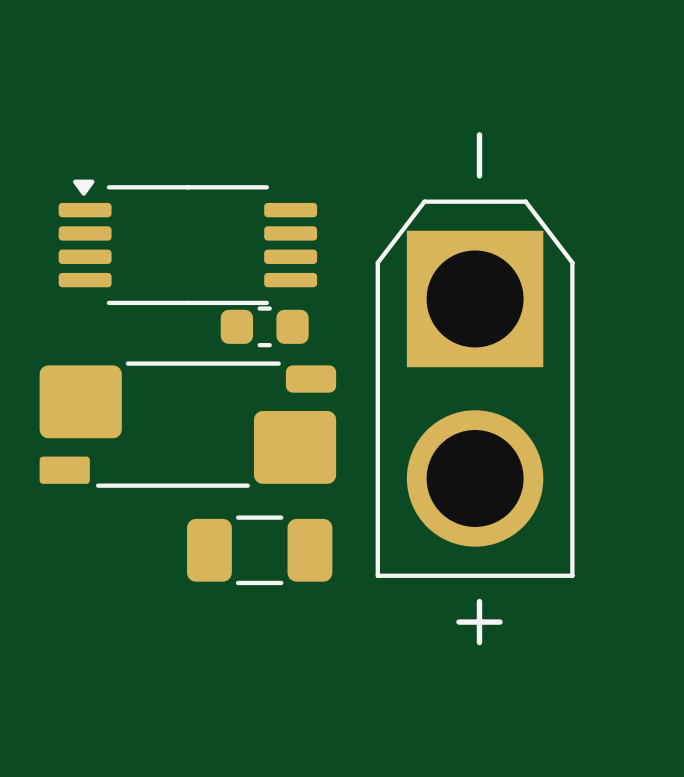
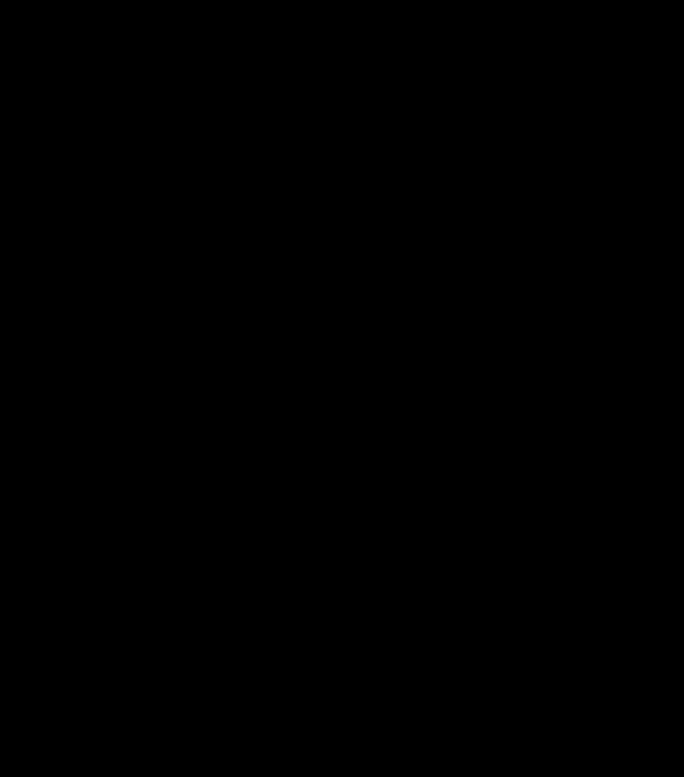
part: (187, 242) -> none
part: (264, 326) -> none
part: (475, 388) -> none
part: (187, 424) -> none
part: (259, 550) -> none

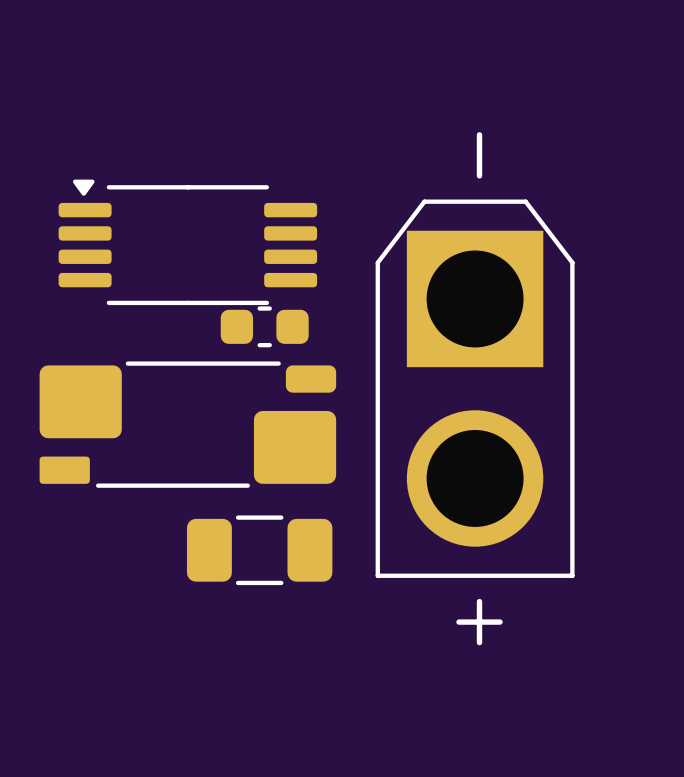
part: none -> (187, 242)
part: none -> (264, 326)
part: none -> (475, 388)
part: none -> (187, 424)
part: none -> (259, 550)

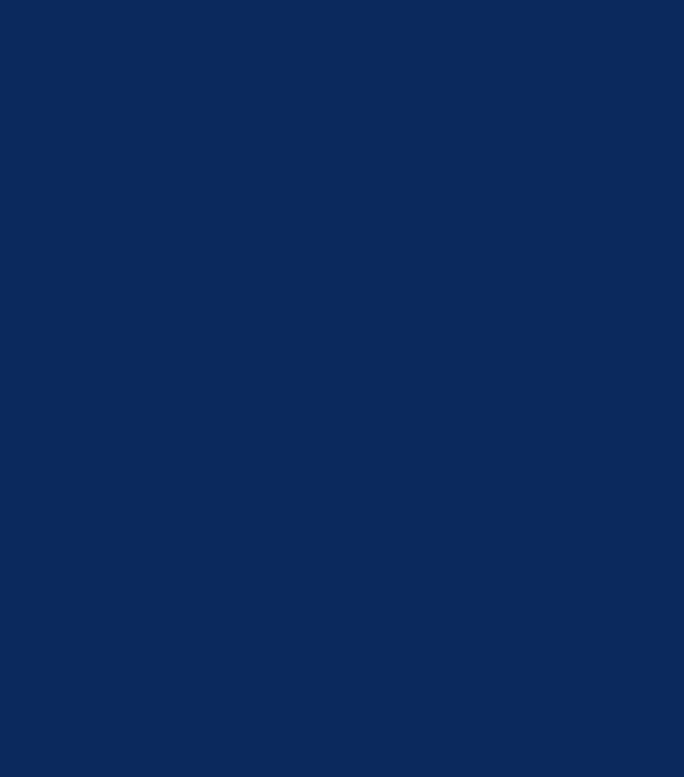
part: (187, 242) -> none
part: (264, 326) -> none
part: (475, 388) -> none
part: (187, 424) -> none
part: (259, 550) -> none

